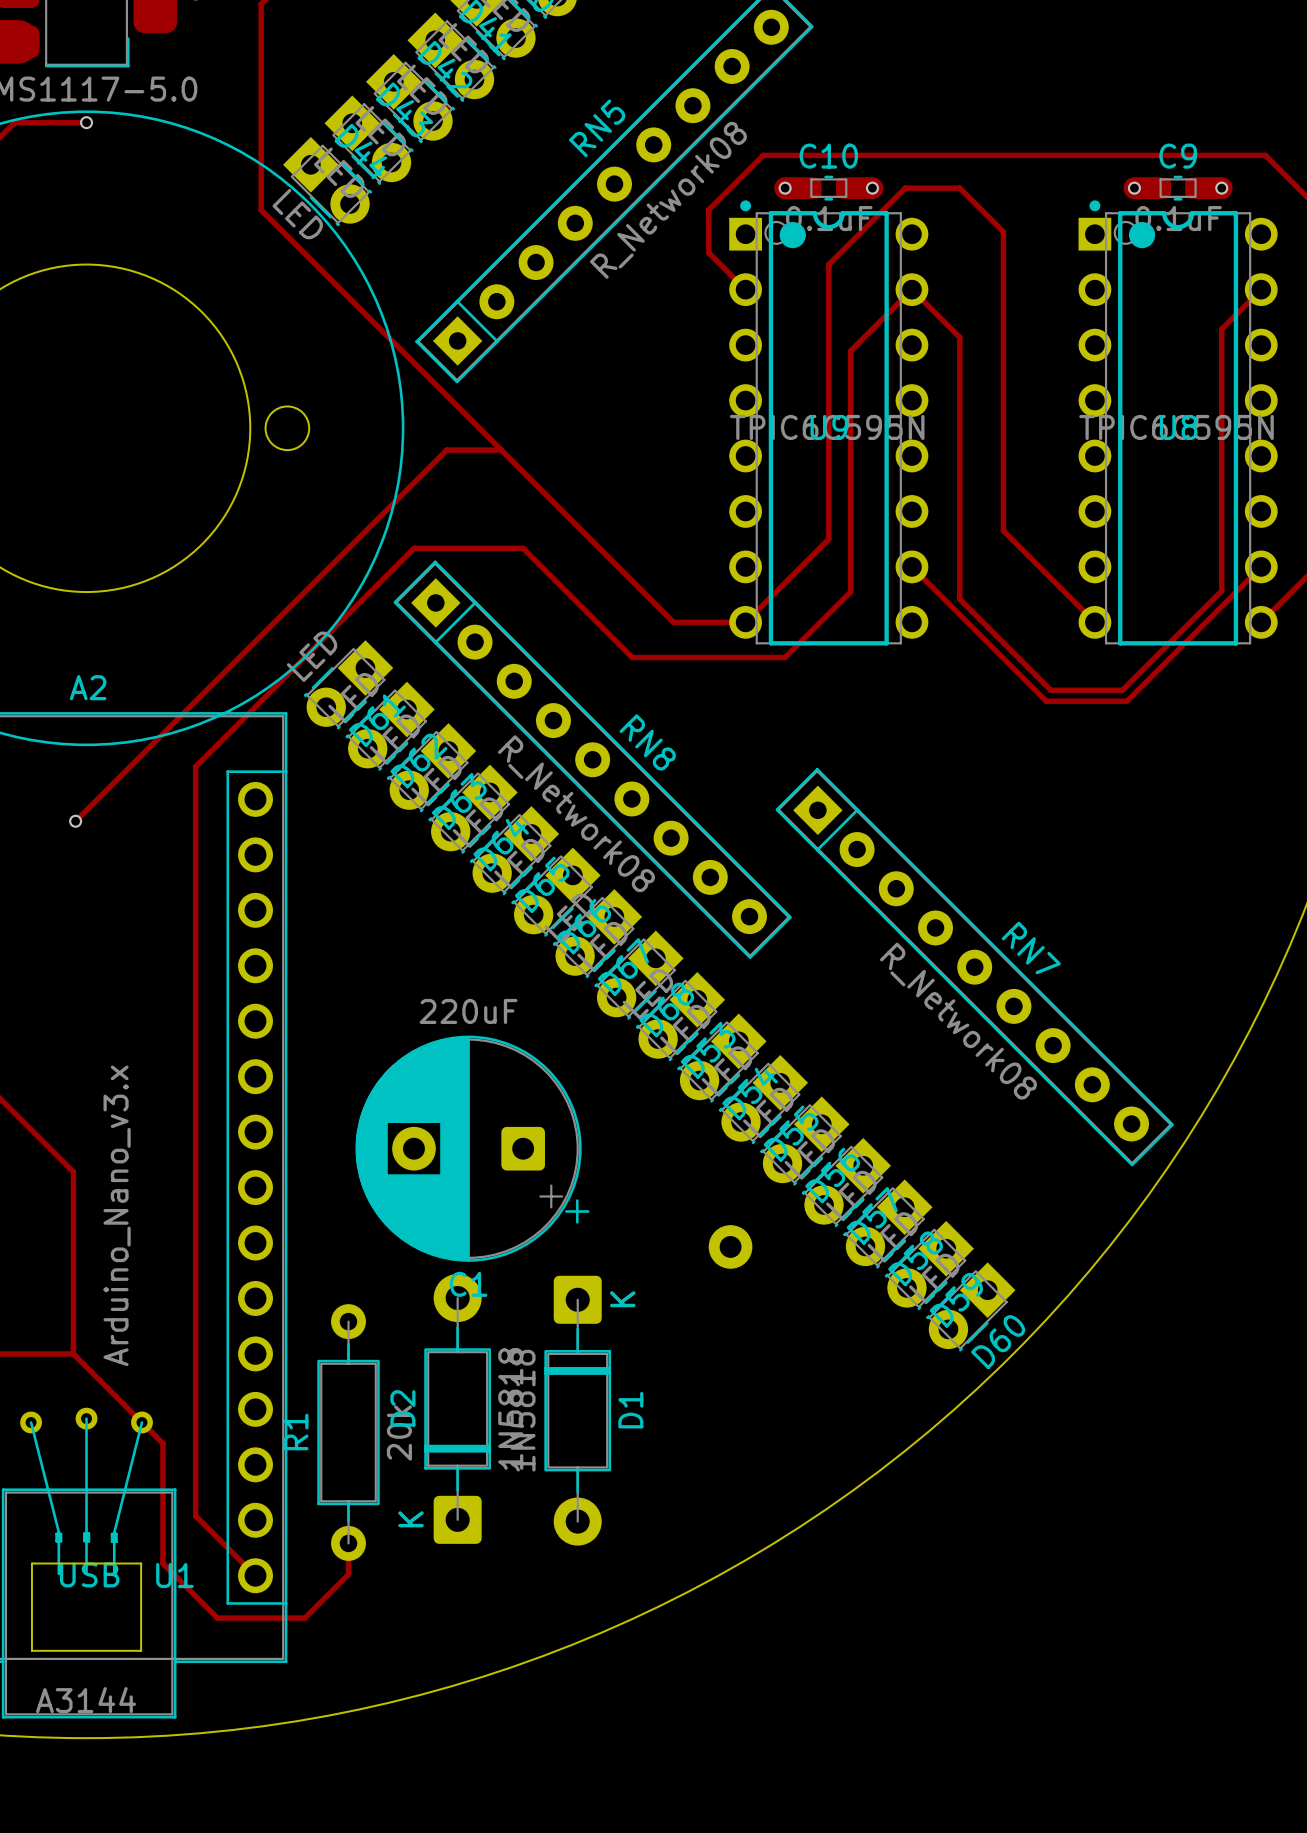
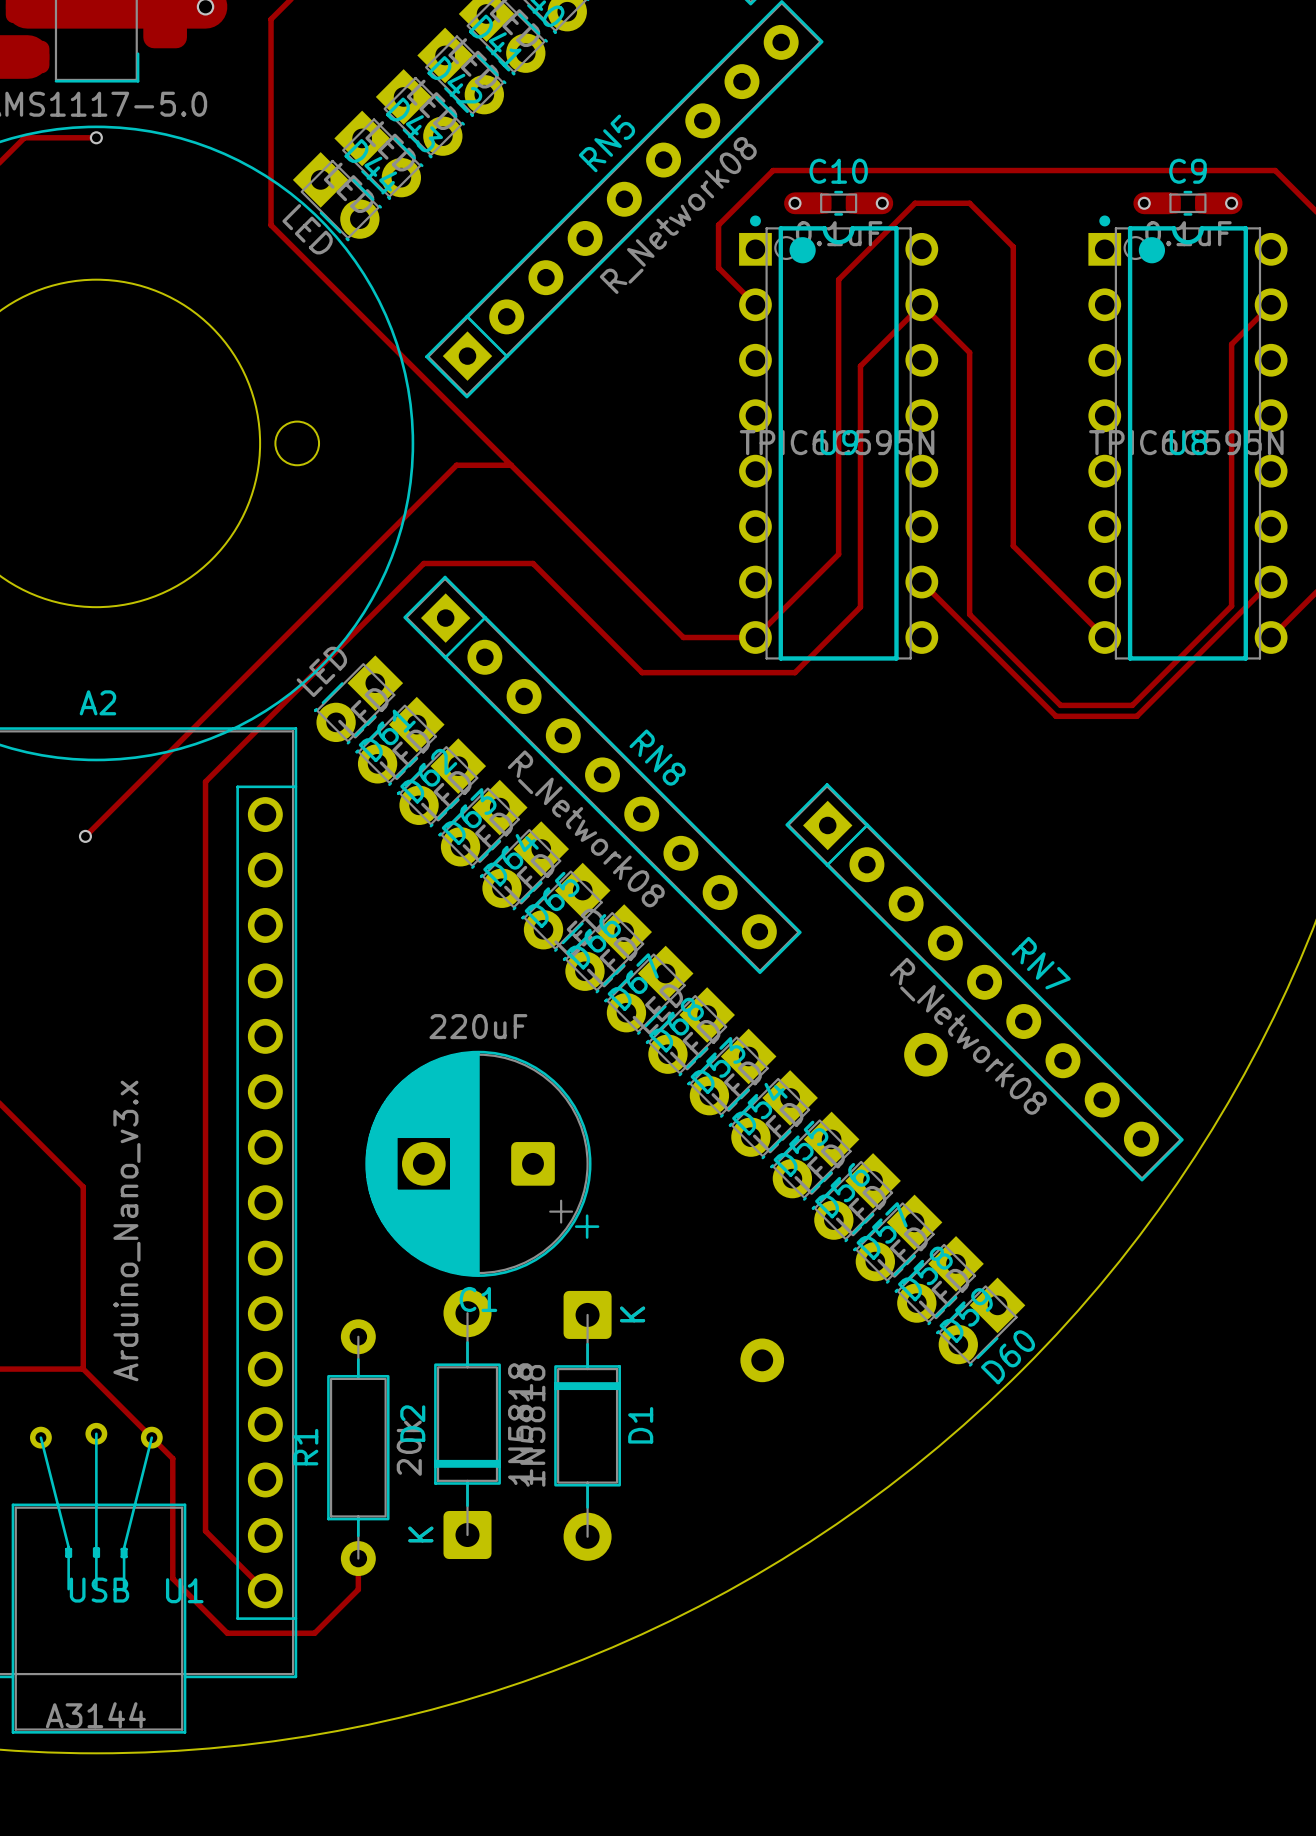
part: none -> (925, 1054)
part position: (730, 1246) -> (762, 1360)
board edge: (31, 1563) (141, 1563) (141, 1650) (31, 1650) (31, 1563) -> none

